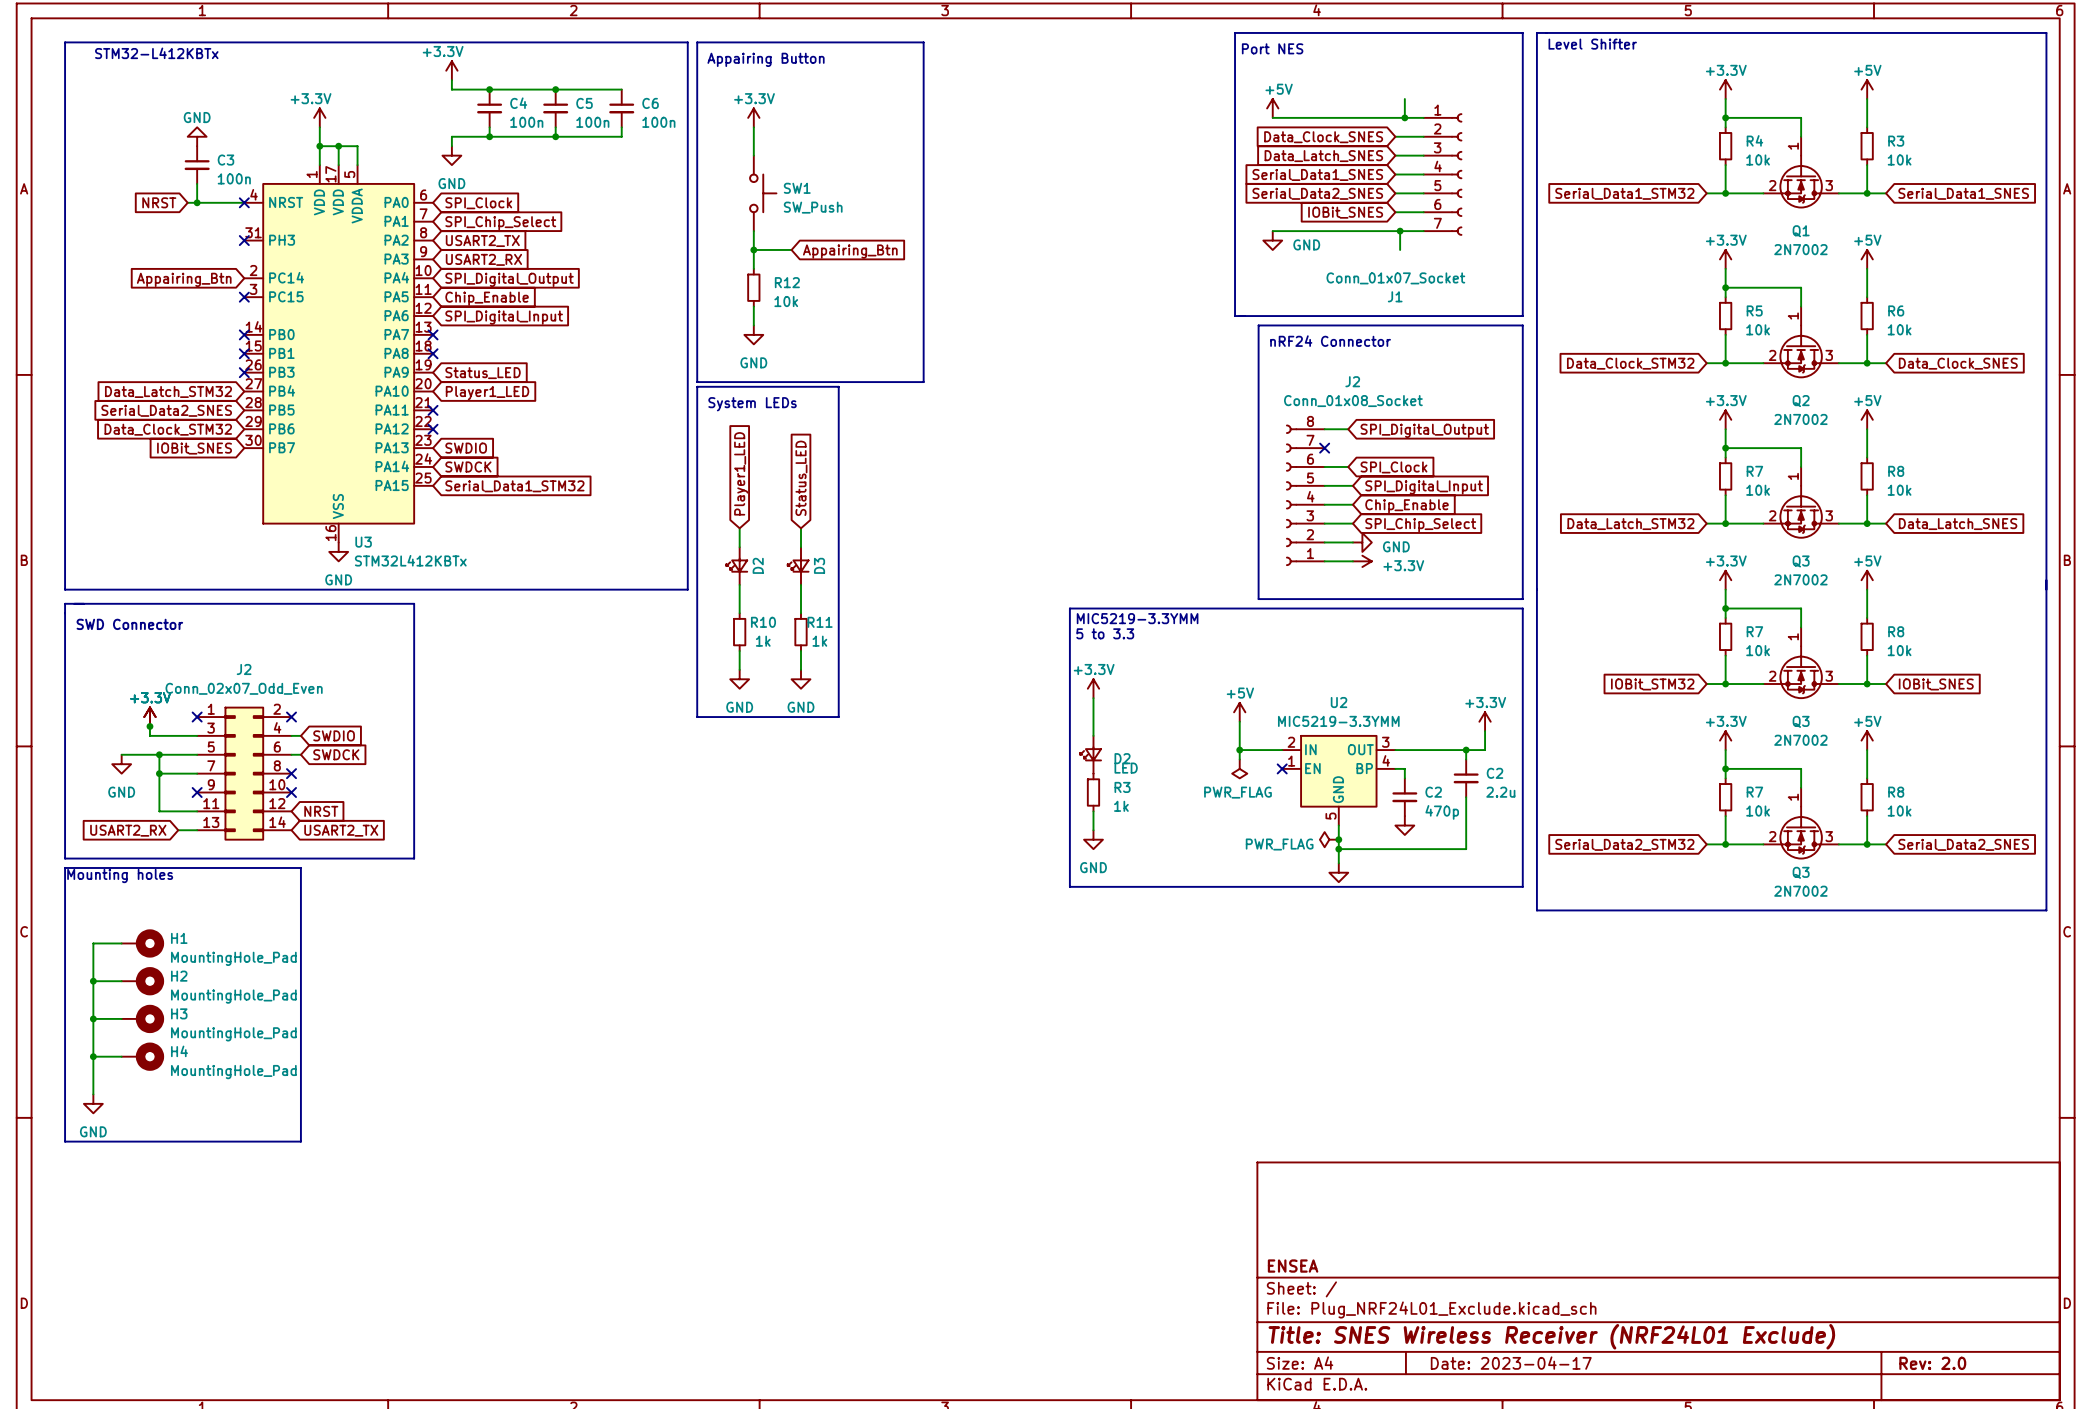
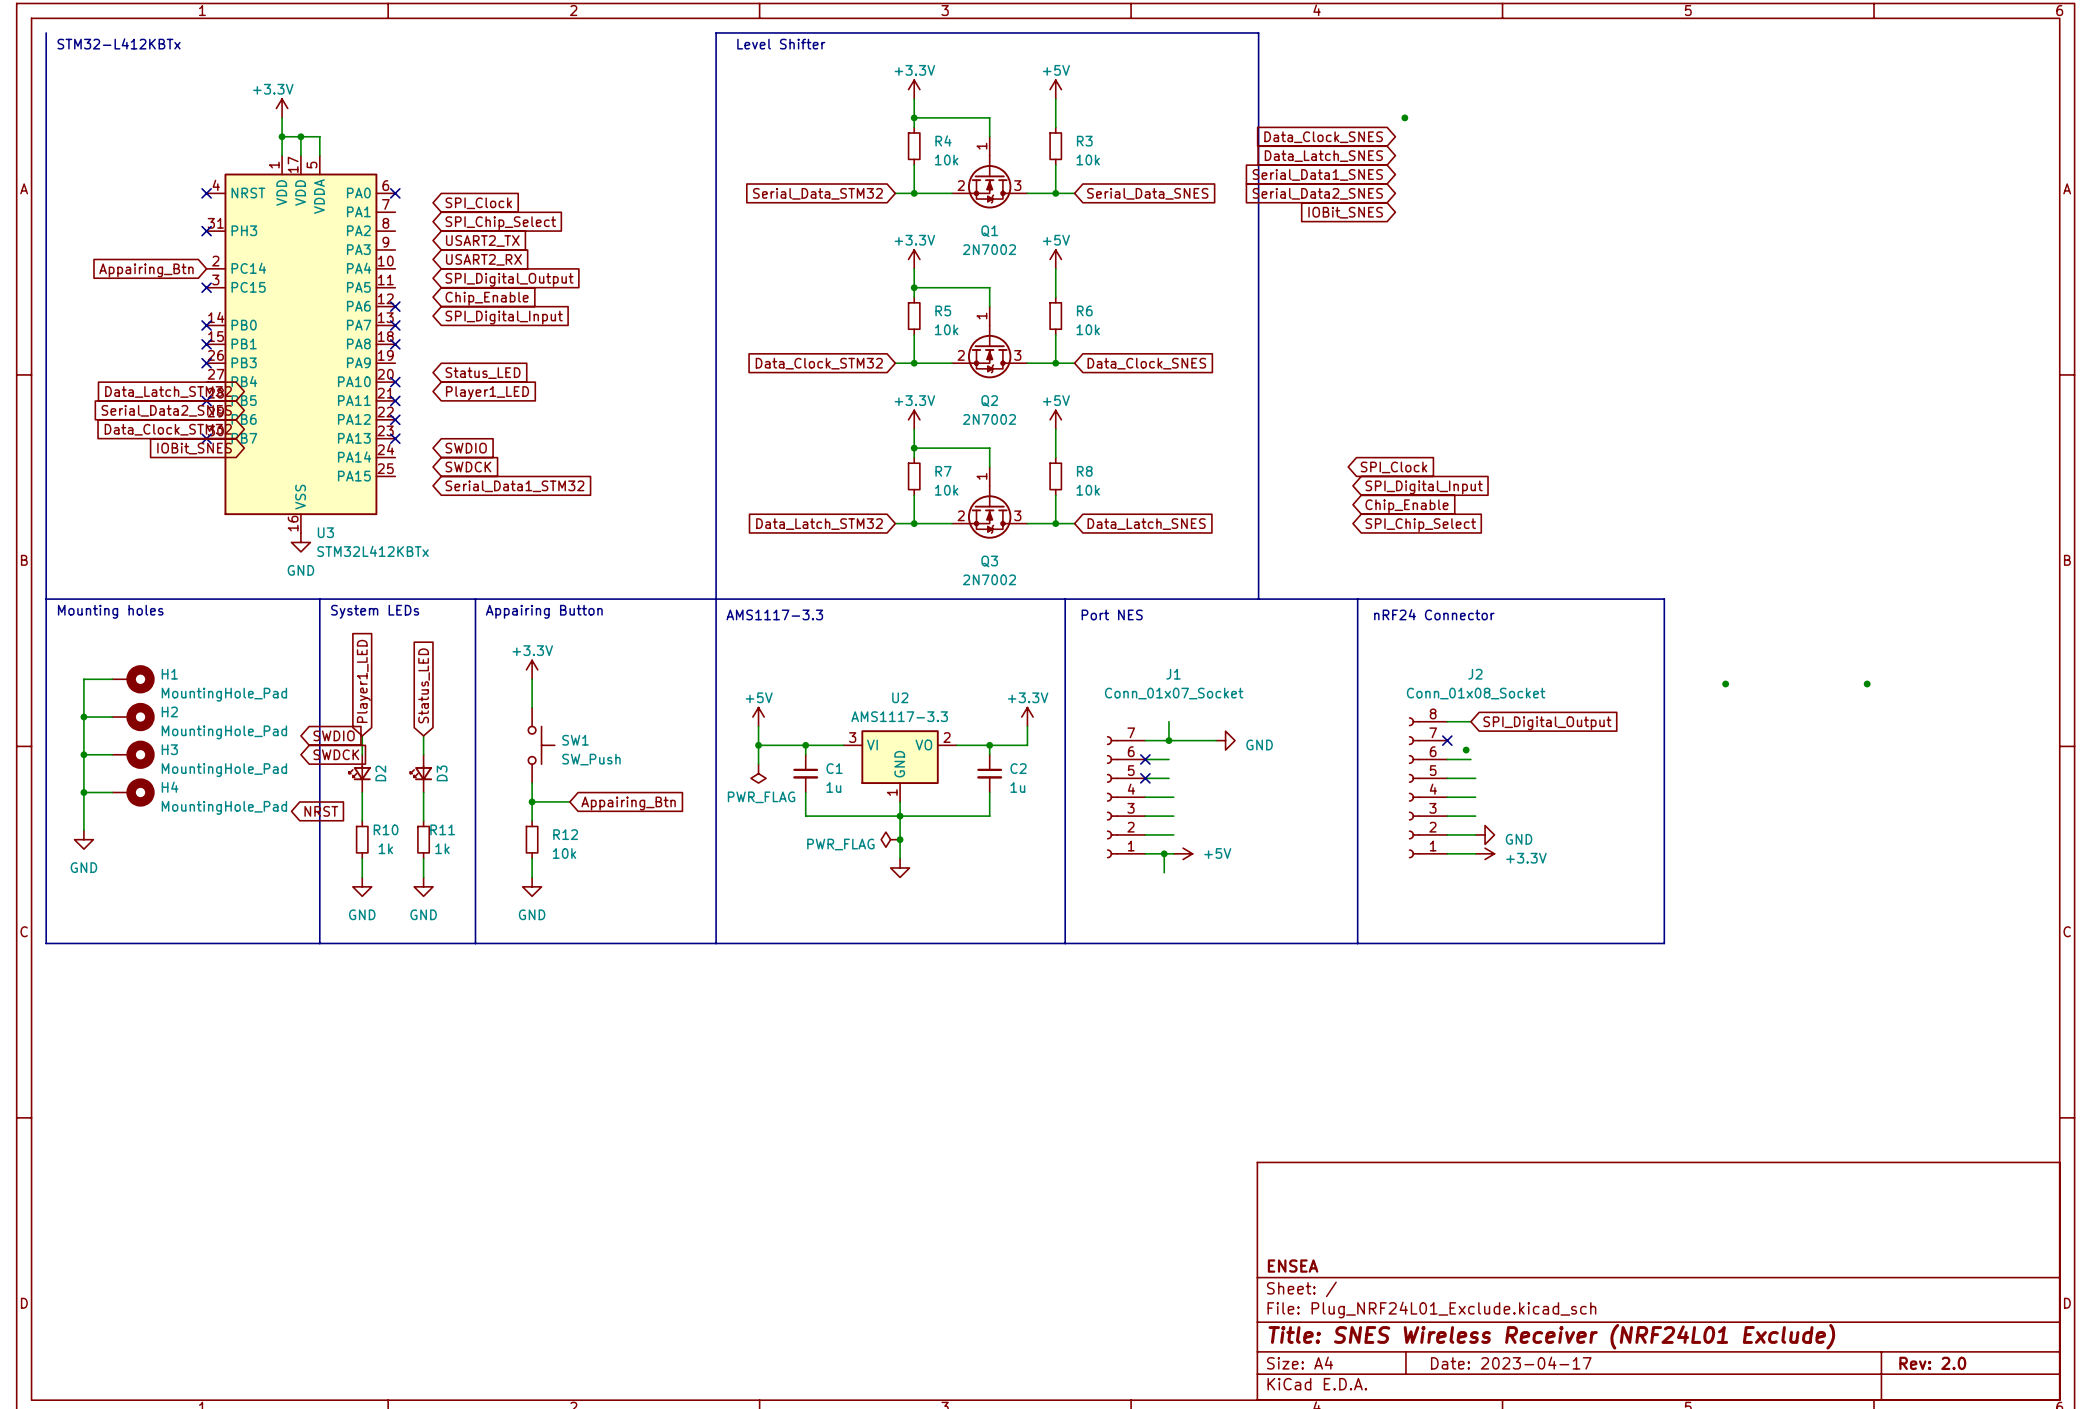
line: (1235, 32) (1235, 316) (1522, 316) (1522, 32) (1258, 32) -> (1258, 325) (1258, 32)
line: none -> (1235, 32) (716, 32) (716, 943)
line: (1536, 32) (2046, 32) (2046, 910) (1536, 910) (1536, 32) -> none
line: (65, 42) (65, 589) (687, 589) (687, 42) (65, 42) -> none
line: (697, 42) (923, 42) (923, 382) (697, 382) (697, 42) -> none
text: none -> Level Shifter (781, 44)
text: Level Shifter (1592, 44) -> none
text: Port NES (1272, 48) -> none
text position: STM32-L412KBTx (156, 53) -> STM32-L412KBTx (119, 43)
text: Appairing Button (766, 59) -> none
power symbol: +3.3V (451, 70) -> none
wire: (451, 80) (451, 89) (621, 89) -> none
junction: (489, 89) -> none
junction: (555, 89) -> none
power symbol: none -> +3.3V (914, 89)
power symbol: none -> +5V (1055, 89)
power symbol: +3.3V (1725, 89) -> none
power symbol: +5V (1867, 89) -> none
wire: none -> (1055, 99) (1055, 127)
wire: (1404, 99) (1404, 117) -> none
wire: (1725, 99) (1725, 127) -> none
wire: (1867, 99) (1867, 127) -> none
C4: 100n (489, 108) -> none
C5: 100n (555, 108) -> none
C6: 100n (621, 108) -> none
power symbol: +5V (1272, 108) -> none
wire: none -> (282, 117) (282, 155)
power symbol position: +3.3V (319, 117) -> +3.3V (282, 108)
power symbol: +3.3V (753, 117) -> none
wire: none -> (914, 117) (989, 117) (989, 136)
junction: none -> (914, 117)
wire: (1272, 117) (1423, 117) -> none
wire: (1725, 117) (1801, 117) (1801, 136) -> none
junction: (1725, 117) -> none
wire: (319, 127) (319, 136) -> (282, 136) (319, 136)
wire: (489, 127) (489, 136) -> none
wire: (555, 127) (555, 136) -> none
wire: (621, 127) (621, 136) (451, 136) (451, 146) -> none
wire: (753, 127) (753, 155) -> (914, 99) (914, 127)
power symbol: GND (197, 136) -> none
junction: none -> (282, 136)
junction: none -> (300, 136)
junction: (489, 136) -> none
junction: (555, 136) -> none
wire: (1395, 136) (1423, 136) -> none
wire: (319, 146) (357, 146) (357, 165) -> none
junction: (319, 146) -> none
wire: (338, 146) (338, 165) -> (300, 136) (300, 155)
junction: (338, 146) -> none
R3: none -> 10k (1055, 146)
R4 position: (1725, 146) -> (914, 146)
R3: 10k (1867, 146) -> none
power symbol: GND (451, 155) -> none
wire: (1395, 155) (1423, 155) -> none
C3: 100n (197, 165) -> none
wire: none -> (914, 165) (914, 193)
wire: none -> (1055, 165) (1055, 193)
wire: (1725, 165) (1725, 193) -> none
wire: (1867, 165) (1867, 193) -> none
Q1 position: (1801, 172) -> (989, 172)
wire: (1395, 174) (1423, 174) -> none
J1 position: (1442, 174) -> (1126, 797)
J1 rotation: 0° (1456, 174) -> 180° (1112, 797)
wire: (197, 183) (197, 202) -> none
no-connect mark: none -> (206, 193)
no-connect mark: none -> (395, 193)
SW1 position: (763, 193) -> (541, 745)
global label: none -> Serial_Data_STM32 (817, 193)
wire: none -> (895, 193) (951, 193)
junction: none -> (914, 193)
wire: none -> (1027, 193) (1074, 193)
junction: none -> (1055, 193)
global label: none -> Serial_Data_SNES (1147, 193)
wire: (1395, 193) (1423, 193) -> none
global label: Serial_Data1_STM32 (1624, 193) -> none
wire: (1706, 193) (1763, 193) -> none
junction: (1725, 193) -> none
wire: (1838, 193) (1886, 193) -> none
junction: (1867, 193) -> none
global label: Serial_Data1_SNES (1963, 193) -> none
global label: NRST (159, 202) -> none
wire: (187, 202) (244, 202) -> none
junction: (197, 202) -> none
no-connect mark: (244, 202) -> none
wire: (1395, 212) (1423, 212) -> none
no-connect mark: none -> (206, 231)
wire: (753, 231) (753, 268) -> none
wire: (1272, 231) (1423, 231) -> none
wire: (1400, 231) (1400, 249) -> none
junction: (1400, 231) -> none
no-connect mark: (244, 240) -> none
power symbol: GND (1272, 240) -> none
wire: (753, 249) (791, 249) -> none
junction: (753, 249) -> none
global label: Appairing_Btn (850, 251) -> none
power symbol: none -> +3.3V (914, 259)
power symbol: none -> +5V (1055, 259)
power symbol: +3.3V (1725, 259) -> none
power symbol: +5V (1867, 259) -> none
wire: none -> (914, 268) (914, 297)
wire: none -> (1055, 268) (1055, 297)
wire: (1725, 268) (1725, 297) -> none
wire: (1867, 268) (1867, 297) -> none
global label position: Appairing_Btn (184, 279) -> Appairing_Btn (146, 270)
no-connect mark: none -> (206, 287)
R12 position: (753, 287) -> (532, 839)
wire: none -> (914, 287) (989, 287) (989, 306)
junction: none -> (914, 287)
wire: (1725, 287) (1801, 287) (1801, 306) -> none
junction: (1725, 287) -> none
no-connect mark: (244, 297) -> none
no-connect mark: none -> (395, 306)
wire: (753, 306) (753, 325) -> none
R5 position: (1725, 316) -> (914, 316)
R6 position: (1867, 316) -> (1055, 316)
no-connect mark: none -> (206, 325)
no-connect mark: none -> (395, 325)
line: (1258, 325) (1522, 325) (1522, 599) -> (46, 32) (46, 943) (1664, 943) (1664, 599) (1522, 599)
no-connect mark: (244, 334) -> none
no-connect mark: (433, 334) -> none
power symbol: GND (753, 334) -> none
wire: none -> (914, 334) (914, 363)
wire: none -> (1055, 334) (1055, 363)
wire: (1725, 334) (1725, 363) -> none
wire: (1867, 334) (1867, 363) -> none
text: nRF24 Connector (1330, 341) -> none
Q2 position: (1801, 342) -> (989, 342)
no-connect mark: none -> (206, 344)
no-connect mark: none -> (395, 344)
no-connect mark: (244, 353) -> none
U3 position: (338, 353) -> (300, 344)
no-connect mark: (433, 353) -> none
no-connect mark: none -> (206, 363)
global label: none -> Data_Clock_STM32 (819, 363)
wire: none -> (895, 363) (951, 363)
junction: none -> (914, 363)
wire: none -> (1027, 363) (1074, 363)
junction: none -> (1055, 363)
global label: none -> Data_Clock_SNES (1146, 363)
global label: Data_Clock_STM32 (1630, 363) -> none
wire: (1706, 363) (1763, 363) -> none
junction: (1725, 363) -> none
wire: (1838, 363) (1886, 363) -> none
junction: (1867, 363) -> none
global label: Data_Clock_SNES (1958, 363) -> none
no-connect mark: (244, 372) -> none
no-connect mark: none -> (395, 382)
line: (697, 386) (697, 717) (838, 717) (838, 386) (697, 386) -> none
no-connect mark: none -> (206, 400)
no-connect mark: none -> (395, 400)
text: System LEDs (752, 404) -> none
no-connect mark: (433, 410) -> none
no-connect mark: none -> (395, 419)
power symbol: none -> +3.3V (914, 419)
power symbol: none -> +5V (1055, 419)
power symbol: +3.3V (1725, 419) -> none
power symbol: +5V (1867, 419) -> none
no-connect mark: (433, 429) -> none
wire: none -> (914, 429) (914, 457)
wire: none -> (1055, 429) (1055, 457)
wire: (1324, 429) (1348, 429) -> none
wire: (1725, 429) (1725, 457) -> none
wire: (1867, 429) (1867, 457) -> none
global label: SPI_Digital_Output (1424, 430) -> none
no-connect mark: none -> (206, 438)
no-connect mark: none -> (395, 438)
wire: none -> (914, 448) (989, 448) (989, 466)
junction: none -> (914, 448)
no-connect mark: (1324, 448) -> none
wire: (1725, 448) (1801, 448) (1801, 466) -> none
junction: (1725, 448) -> none
wire: (1324, 466) (1348, 466) -> none
global label: Player1_LED (741, 473) -> none
R7: none -> 10k (914, 476)
R8: none -> 10k (1055, 476)
R7: 10k (1725, 476) -> none
R8: 10k (1867, 476) -> none
global label: Status_LED (801, 478) -> none
wire: (1324, 485) (1352, 485) -> none
wire: none -> (1055, 495) (1055, 523)
J2: Conn_01x08_Socket (1305, 495) -> none
wire: (1725, 495) (1725, 523) -> none
wire: (1867, 495) (1867, 523) -> none
Q3: none -> 2N7002 (989, 502)
Q3: 2N7002 (1801, 502) -> none
wire: (1324, 504) (1352, 504) -> none
wire: none -> (895, 523) (951, 523)
junction: none -> (914, 523)
wire: none -> (1027, 523) (1074, 523)
junction: none -> (1055, 523)
wire: (1324, 523) (1352, 523) -> none
wire: (1706, 523) (1763, 523) -> none
junction: (1725, 523) -> none
wire: (1838, 523) (1886, 523) -> none
junction: (1867, 523) -> none
global label: none -> Data_Latch_STM32 (819, 524)
global label: none -> Data_Latch_SNES (1146, 524)
global label: Data_Latch_STM32 (1630, 524) -> none
global label: Data_Latch_SNES (1958, 524) -> none
wire: (739, 528) (739, 547) -> none
wire: (801, 528) (801, 547) -> none
wire: (1324, 542) (1352, 542) -> none
power symbol: GND (1362, 542) -> none
power symbol position: GND (338, 551) -> GND (300, 542)
wire: (1324, 561) (1352, 561) -> none
power symbol: +3.3V (1362, 561) -> none
D2: (737, 566) -> none
D3 position: (798, 566) -> (421, 773)
power symbol: +3.3V (1725, 580) -> none
power symbol: +5V (1867, 580) -> none
wire: (739, 584) (739, 613) -> none
wire: (801, 584) (801, 613) -> (914, 495) (914, 523)
wire: (1725, 589) (1725, 617) -> none
wire: (1867, 589) (1867, 617) -> none
line: none -> (46, 599) (1258, 599)
line: none -> (319, 599) (319, 943)
line: none -> (475, 599) (475, 943)
line: none -> (1065, 599) (1065, 943)
line: none -> (1357, 599) (1357, 943)
line: (65, 603) (65, 858) (414, 858) (414, 603) (65, 603) -> none
line: (1069, 608) (1069, 886) (1522, 886) (1522, 608) (1069, 608) -> none
wire: (1725, 608) (1801, 608) (1801, 627) -> none
junction: (1725, 608) -> none
text: none -> Mounting holes (110, 611)
text: none -> System LEDs (375, 611)
text: none -> Appairing Button (544, 611)
text: none -> AMS1117-3.3 (774, 614)
text: none -> nRF24 Connector (1434, 614)
text: MIC5219-3.3YMM (1137, 618) -> Port NES (1112, 614)
text: SWD Connector (129, 624) -> none
R10 position: (739, 632) -> (362, 839)
R11 position: (801, 632) -> (423, 839)
text: 5 to 3.3 (1105, 633) -> none
R7: 10k (1725, 636) -> none
R8: 10k (1867, 636) -> none
wire: (739, 650) (739, 669) -> none
wire: (801, 650) (801, 669) -> none
wire: (1725, 655) (1725, 684) -> none
wire: (1867, 655) (1867, 684) -> none
Q3: 2N7002 (1801, 663) -> none
power symbol: none -> +3.3V (532, 669)
wire: none -> (112, 679) (83, 679) (83, 830)
wire: none -> (532, 679) (532, 707)
power symbol: GND (739, 679) -> none
power symbol: GND (801, 679) -> none
global label: none -> Player1_LED (363, 681)
global label: IOBit_STM32 (1652, 684) -> none
wire: (1706, 684) (1763, 684) -> none
wire: (1838, 684) (1886, 684) -> none
global label: IOBit_SNES (1936, 684) -> none
global label: none -> Status_LED (424, 685)
power symbol position: +3.3V (1093, 688) -> +3.3V (1027, 717)
power symbol text position: +5V (1240, 693) -> +5V (1217, 853)
wire: (1093, 698) (1093, 735) -> none
power symbol text position: +3.3V (1485, 702) -> +3.3V (1526, 858)
power symbol rotation: 0° (1239, 712) -> 90° clockwise (1183, 853)
power symbol position: +5V (1239, 712) -> +5V (1183, 853)
wire: none -> (83, 717) (112, 717)
junction: none -> (83, 717)
power symbol: +3.3V (149, 717) -> none
no-connect mark: (197, 717) -> none
no-connect mark: (291, 717) -> none
power symbol: none -> +5V (758, 717)
wire: none -> (1168, 721) (1168, 740)
wire: (1239, 721) (1239, 759) -> none
U2 value: MIC5219-3.3YMM (1338, 721) -> AMS1117-3.3 (899, 716)
wire: none -> (1447, 721) (1470, 721)
power symbol rotation: 0° (1485, 721) -> 90° clockwise (1485, 853)
power symbol position: +3.3V (1485, 721) -> +3.3V (1485, 853)
global label: none -> SPI_Digital_Output (1547, 723)
wire: (149, 726) (149, 735) (197, 735) -> none
junction: (149, 726) -> none
wire: none -> (758, 726) (758, 764)
wire: none -> (1027, 726) (1027, 745) (956, 745)
wire: (1485, 731) (1485, 750) (1395, 750) -> none
U2 symbol: [1282, 734, 1396, 826] -> [843, 730, 957, 802]
wire: (291, 735) (300, 735) -> none
wire: none -> (362, 735) (362, 754)
wire: none -> (423, 735) (423, 754)
wire: none -> (1145, 740) (1216, 740)
junction: none -> (1168, 740)
power symbol: none -> GND (1225, 740)
no-connect mark: none -> (1447, 740)
power symbol: +3.3V (1725, 740) -> none
power symbol: +5V (1867, 740) -> none
wire: none -> (758, 745) (843, 745)
junction: none -> (758, 745)
wire: none -> (805, 745) (805, 754)
junction: none -> (805, 745)
wire: none -> (989, 745) (989, 754)
junction: none -> (989, 745)
wire: (1239, 750) (1282, 750) -> none
junction: (1239, 750) -> none
wire: (1466, 750) (1466, 759) -> none
wire: (1725, 750) (1725, 778) -> none
wire: (1867, 750) (1867, 778) -> none
wire: none -> (83, 754) (112, 754)
junction: none -> (83, 754)
wire: (121, 754) (197, 754) -> none
wire: (159, 754) (159, 811) (197, 811) -> none
junction: (159, 754) -> none
wire: (291, 754) (300, 754) -> none
D2: LED (1091, 754) -> none
wire: none -> (1145, 759) (1168, 759)
no-connect mark: none -> (1145, 759)
wire: none -> (1447, 759) (1470, 759)
power symbol position: GND (121, 764) -> GND (83, 839)
power symbol: PWR_FLAG (1239, 768) -> none
no-connect mark: (1282, 768) -> none
wire: (1395, 768) (1404, 768) (1404, 778) -> none
wire: (1725, 768) (1801, 768) (1801, 787) -> none
junction: (1725, 768) -> none
wire: (159, 773) (197, 773) -> none
junction: (159, 773) -> none
J2: Conn_02x07_Odd_Even (244, 773) -> none
no-connect mark: (291, 773) -> none
D2: none -> (359, 773)
power symbol: none -> PWR_FLAG (758, 773)
C1: none -> 1u (805, 773)
C2: none -> 1u (989, 773)
wire: none -> (1145, 778) (1168, 778)
no-connect mark: none -> (1145, 778)
wire: none -> (1447, 778) (1475, 778)
C2: 2.2u (1466, 778) -> none
wire: none -> (532, 783) (532, 801)
J2: none -> Conn_01x08_Socket (1428, 787)
wire: none -> (83, 792) (112, 792)
junction: none -> (83, 792)
no-connect mark: (197, 792) -> none
no-connect mark: (291, 792) -> none
wire: none -> (362, 792) (362, 820)
wire: none -> (423, 792) (423, 820)
wire: none -> (805, 792) (805, 816) (989, 816) (989, 792)
R3: 1k (1093, 792) -> none
wire: none -> (1145, 797) (1173, 797)
C2: 470p (1404, 797) -> none
wire: none -> (1447, 797) (1475, 797)
wire: (1466, 797) (1466, 849) (1338, 849) -> none
R7: 10k (1725, 797) -> none
R8: 10k (1867, 797) -> none
wire: none -> (532, 801) (532, 820)
wire: none -> (532, 801) (569, 801)
junction: none -> (532, 801)
wire: none -> (900, 801) (900, 858)
global label: none -> Appairing_Btn (628, 803)
wire: (1093, 811) (1093, 830) -> (1164, 853) (1164, 872)
junction: none -> (900, 816)
wire: none -> (1145, 816) (1173, 816)
wire: none -> (1447, 816) (1475, 816)
wire: (1725, 816) (1725, 844) -> none
wire: (1867, 816) (1867, 844) -> none
Q3: 2N7002 (1801, 823) -> none
wire: (1338, 825) (1338, 863) -> none
power symbol: (1404, 825) -> none
global label: USART2_RX (128, 830) -> none
wire: (178, 830) (197, 830) -> none
global label: USART2_TX (341, 830) -> none
wire: none -> (1145, 834) (1173, 834)
wire: none -> (1447, 834) (1475, 834)
power symbol: none -> GND (1485, 834)
power symbol: none -> PWR_FLAG (890, 839)
junction: none -> (900, 839)
power symbol: GND (1093, 839) -> none
power symbol: PWR_FLAG (1329, 839) -> none
junction: (1338, 839) -> none
global label: Serial_Data2_STM32 (1624, 844) -> none
wire: (1706, 844) (1763, 844) -> none
junction: (1725, 844) -> none
wire: (1838, 844) (1886, 844) -> none
junction: (1867, 844) -> none
global label: Serial_Data2_SNES (1963, 844) -> none
junction: (1338, 849) -> none
wire: none -> (1145, 853) (1173, 853)
junction: none -> (1164, 853)
wire: none -> (1447, 853) (1475, 853)
wire: none -> (362, 858) (362, 877)
wire: none -> (423, 858) (423, 877)
wire: none -> (532, 858) (532, 877)
line: (65, 867) (65, 1141) (300, 1141) (300, 867) (65, 867) -> none
power symbol: none -> (900, 867)
power symbol: (1338, 872) -> none
text: Mounting holes (120, 875) -> none
power symbol: none -> GND (362, 886)
power symbol: none -> GND (423, 886)
power symbol: none -> GND (532, 886)
wire: (121, 943) (93, 943) (93, 1094) -> none
H1 position: (142, 943) -> (133, 679)
wire: (93, 981) (121, 981) -> none
junction: (93, 981) -> none
H2 position: (142, 981) -> (133, 717)
wire: (93, 1018) (121, 1018) -> none
junction: (93, 1018) -> none
H3 position: (142, 1018) -> (133, 754)
wire: (93, 1056) (121, 1056) -> none
junction: (93, 1056) -> none
H4 position: (142, 1056) -> (133, 792)
power symbol: GND (93, 1103) -> none

